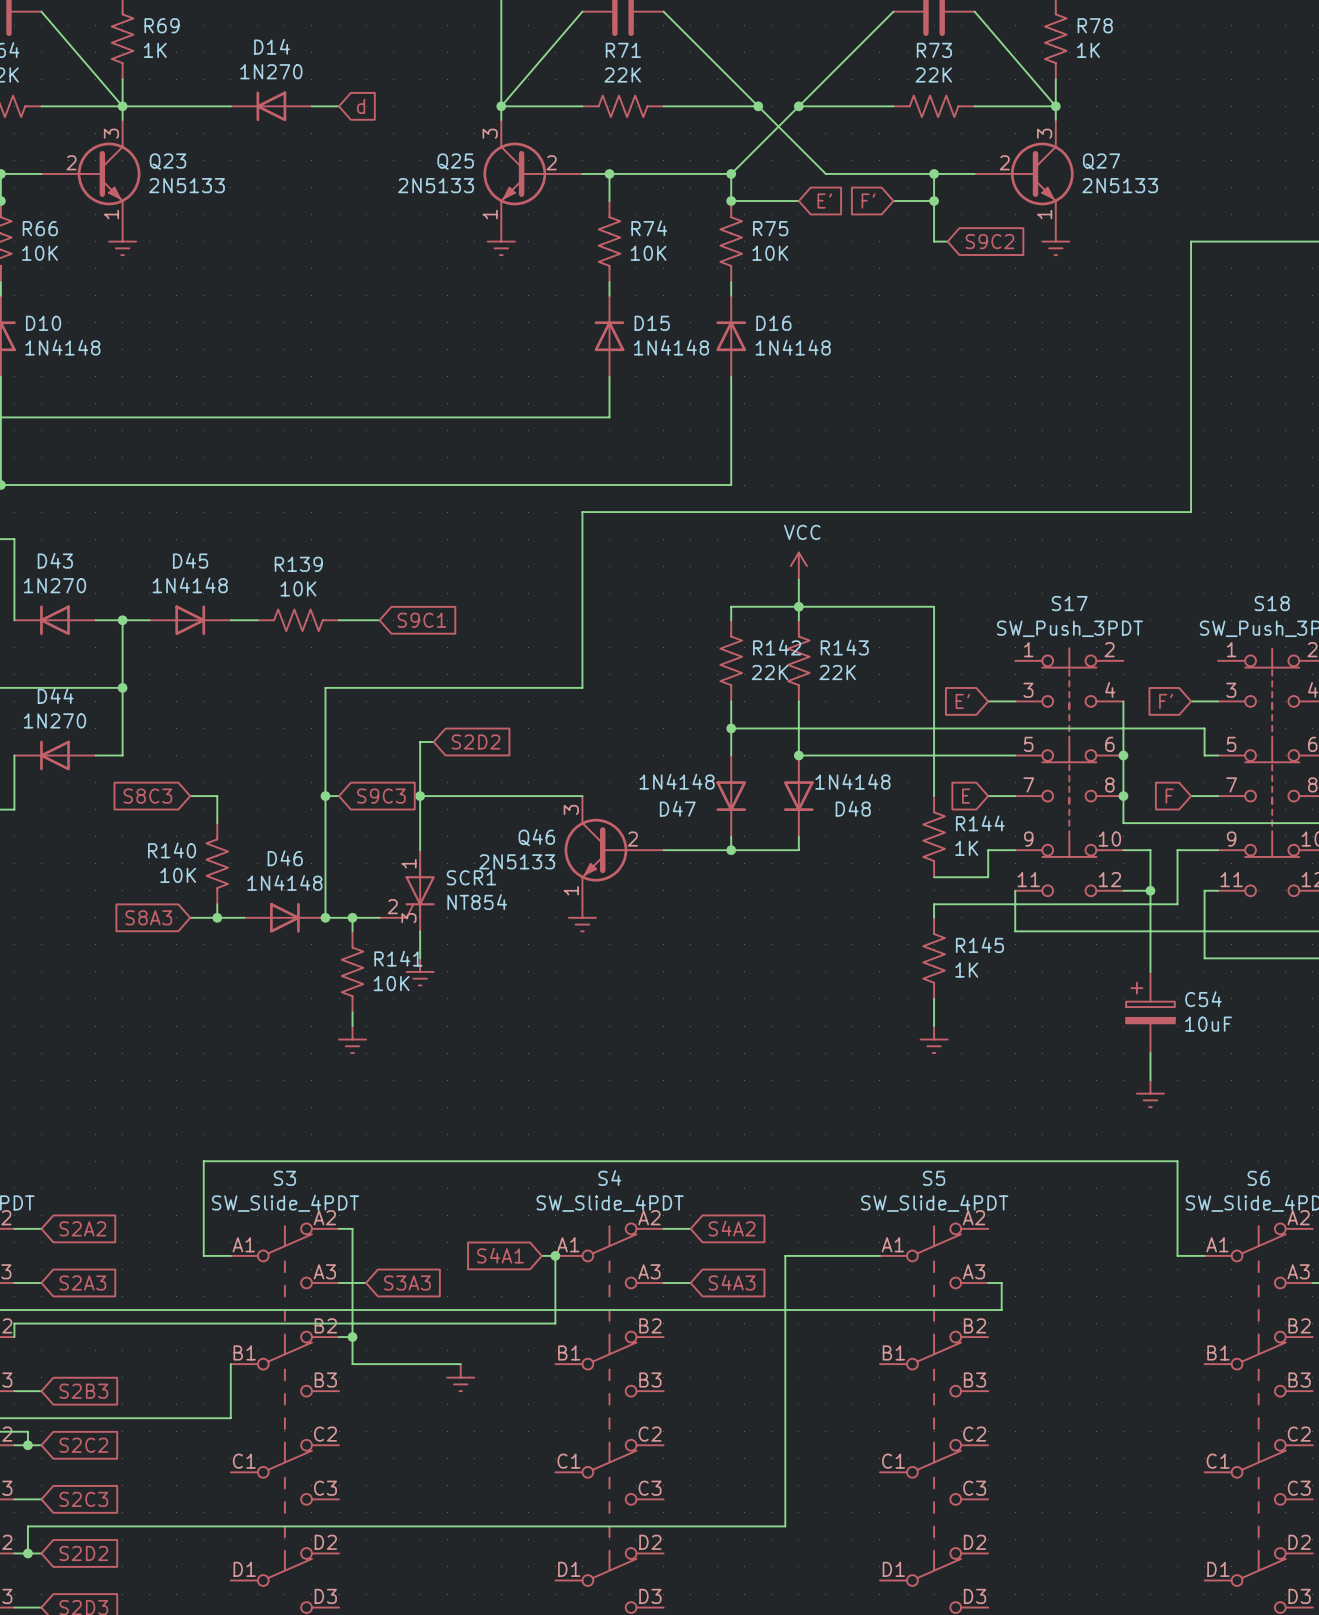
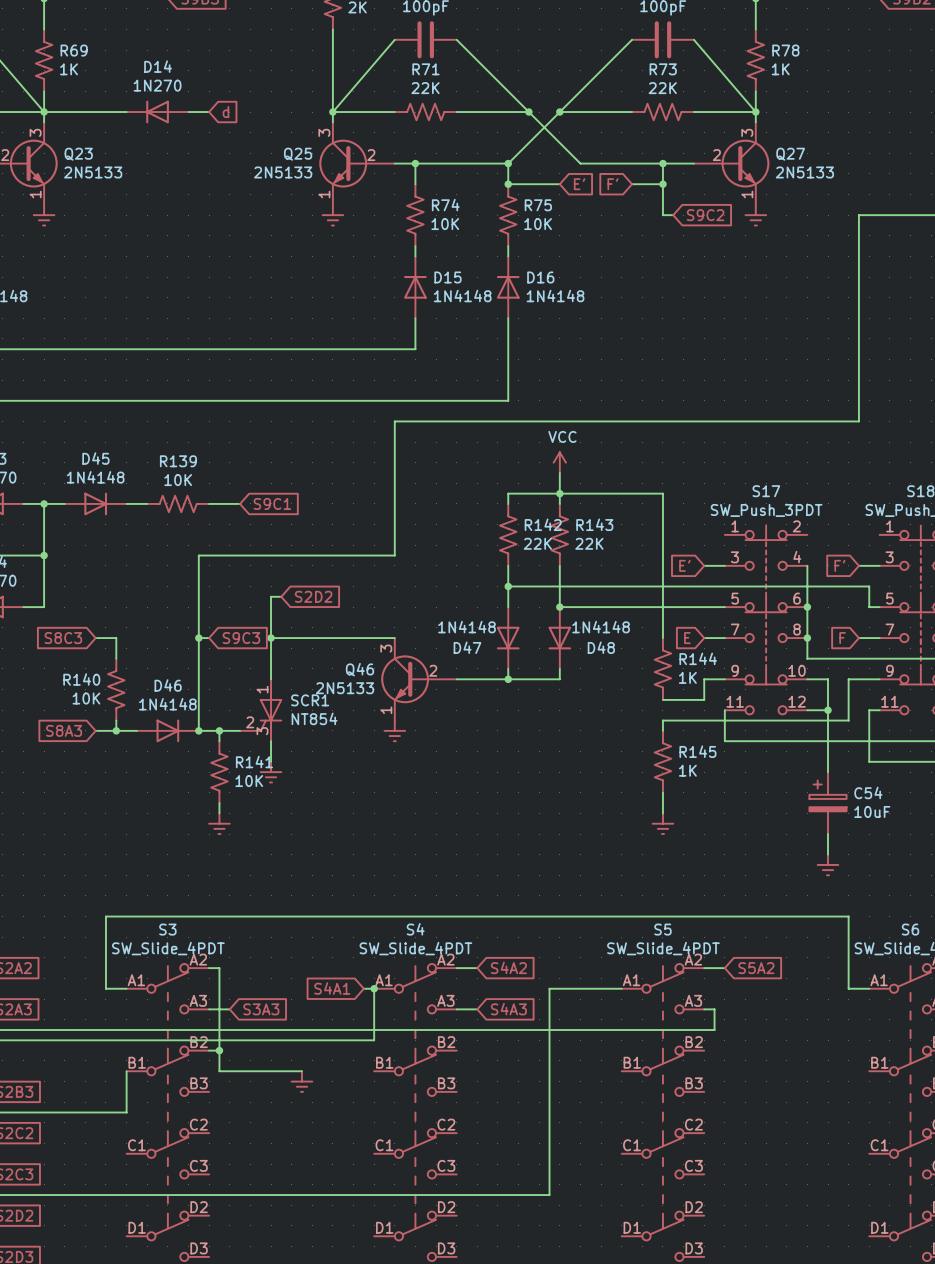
wire: none -> (704, 968) (724, 968)
global label: none -> S5A2 (756, 968)

